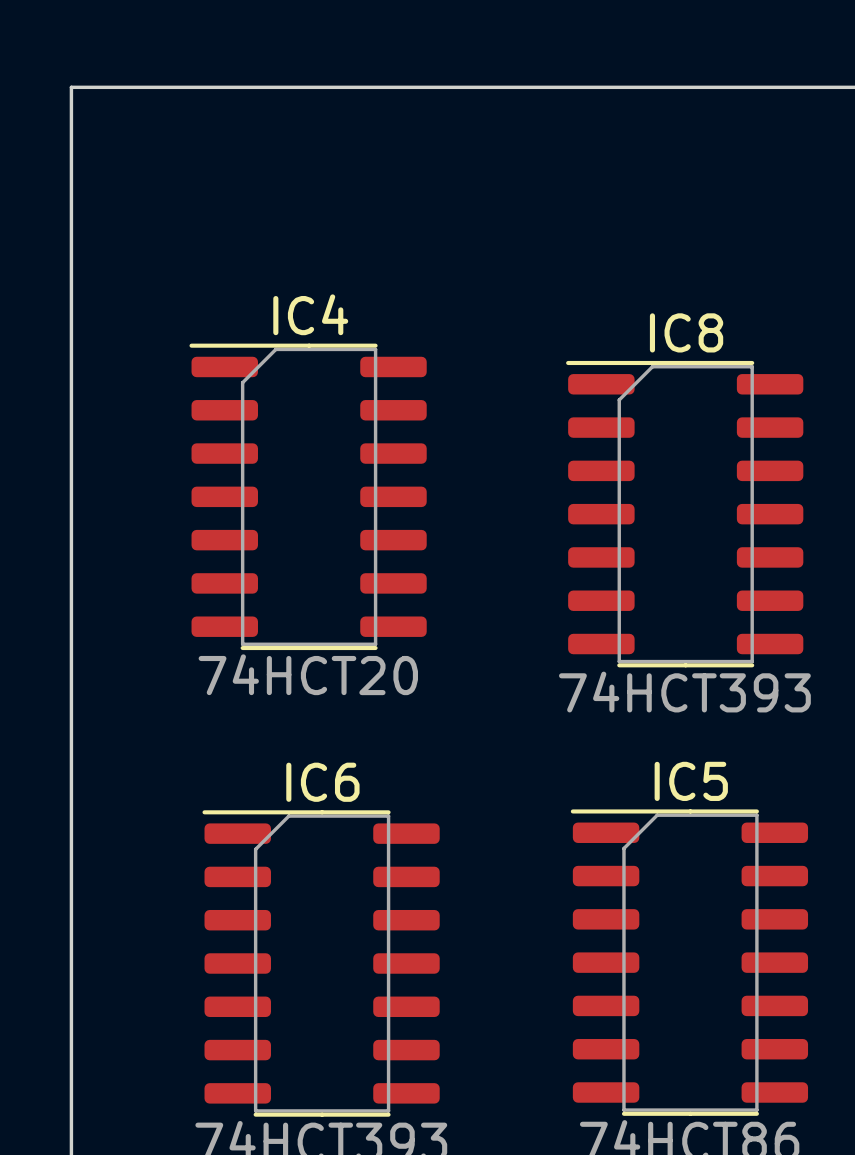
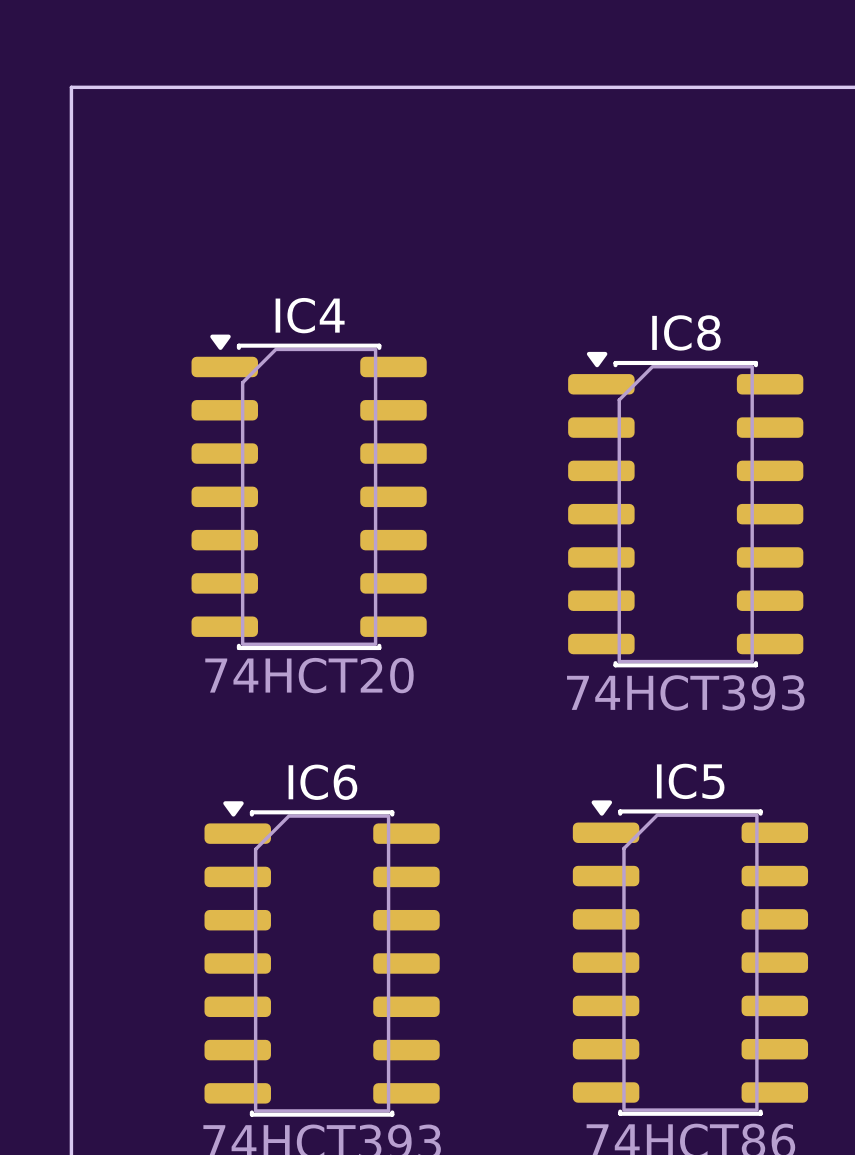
IC4 footprint: [189, 343, 427, 651] -> [191, 334, 427, 651]
IC8 footprint: [566, 360, 804, 668] -> [568, 351, 804, 668]
IC5 footprint: [570, 809, 809, 1116] -> [572, 800, 809, 1116]
IC6 footprint: [202, 810, 440, 1117] -> [204, 801, 440, 1117]

